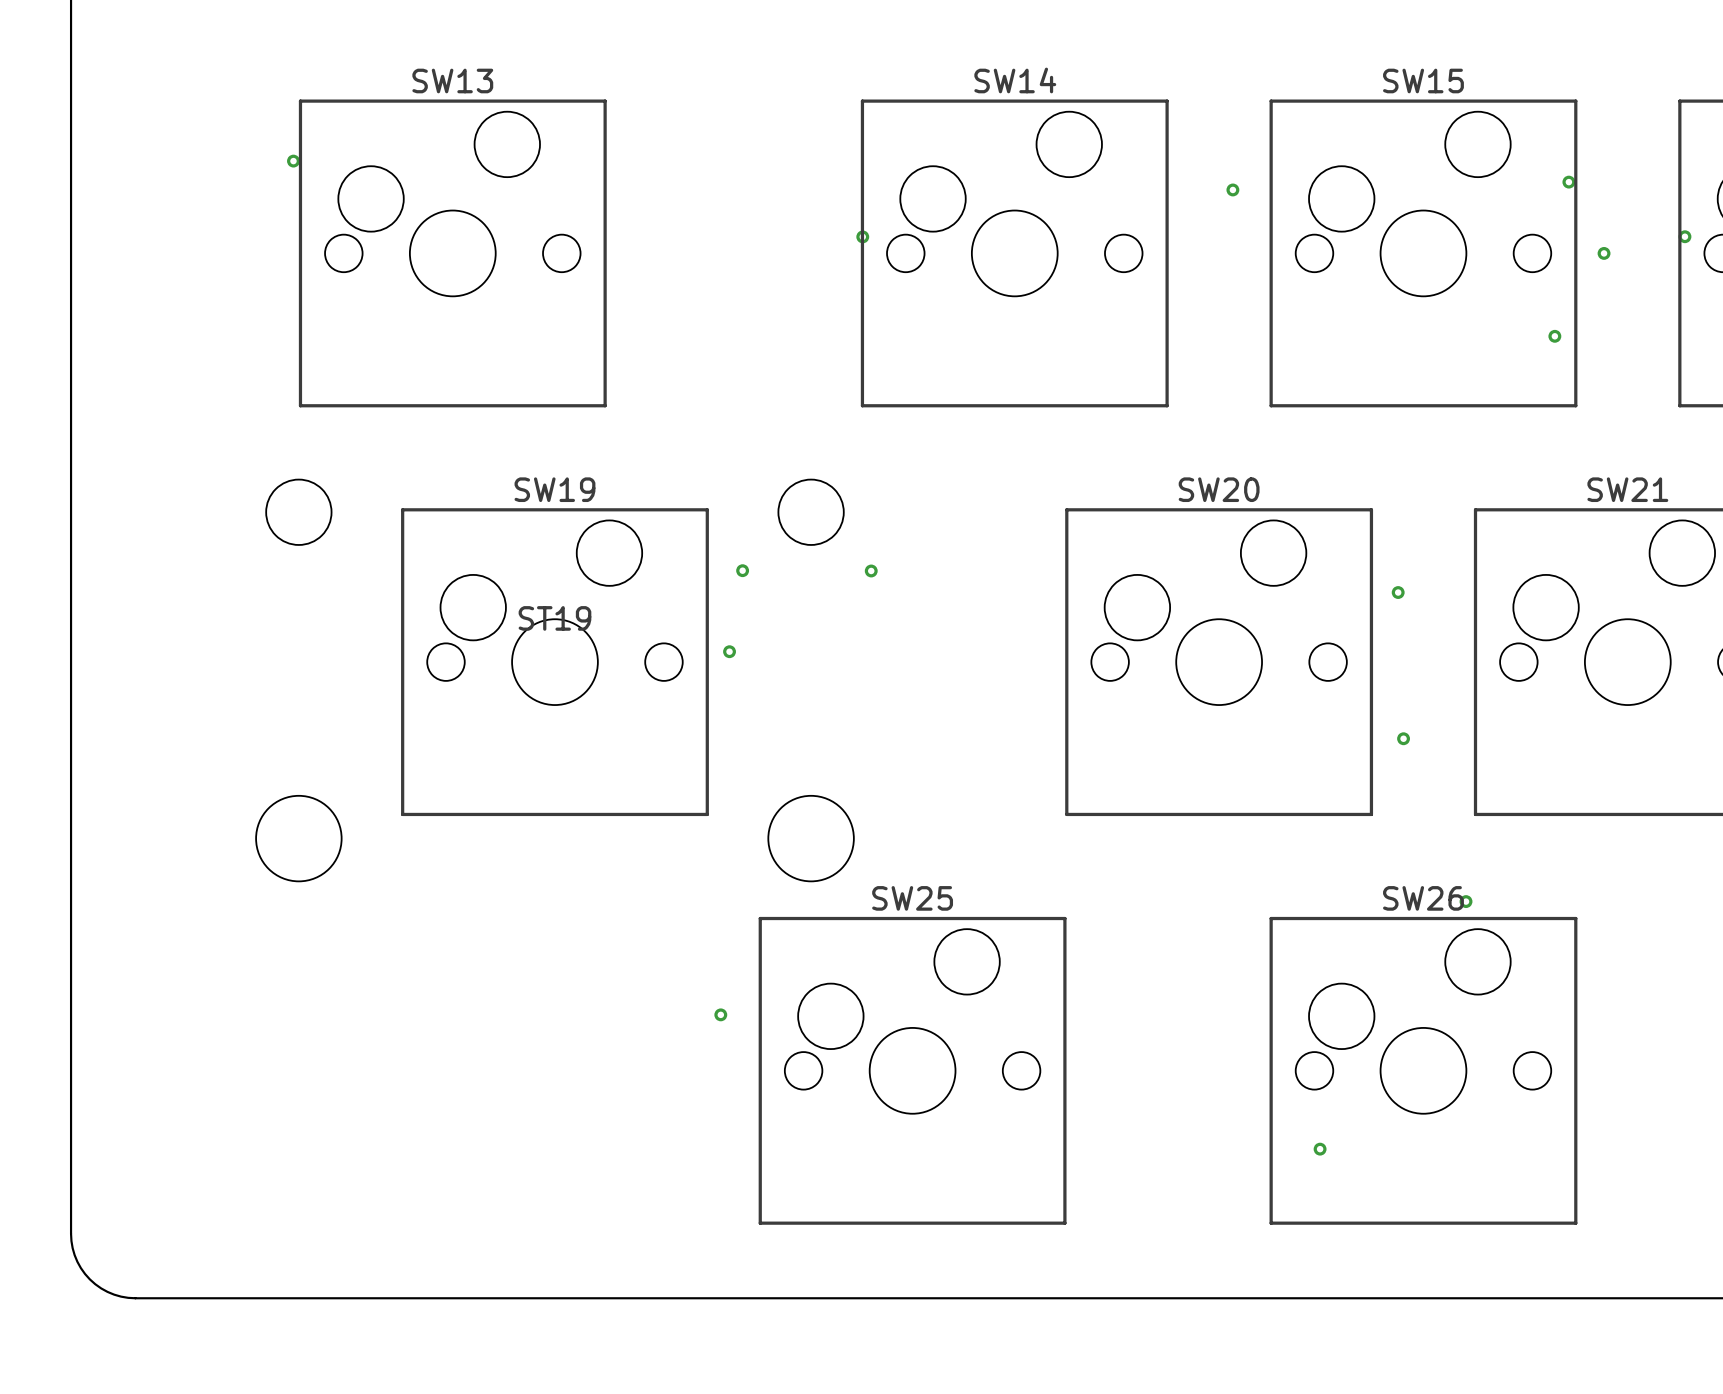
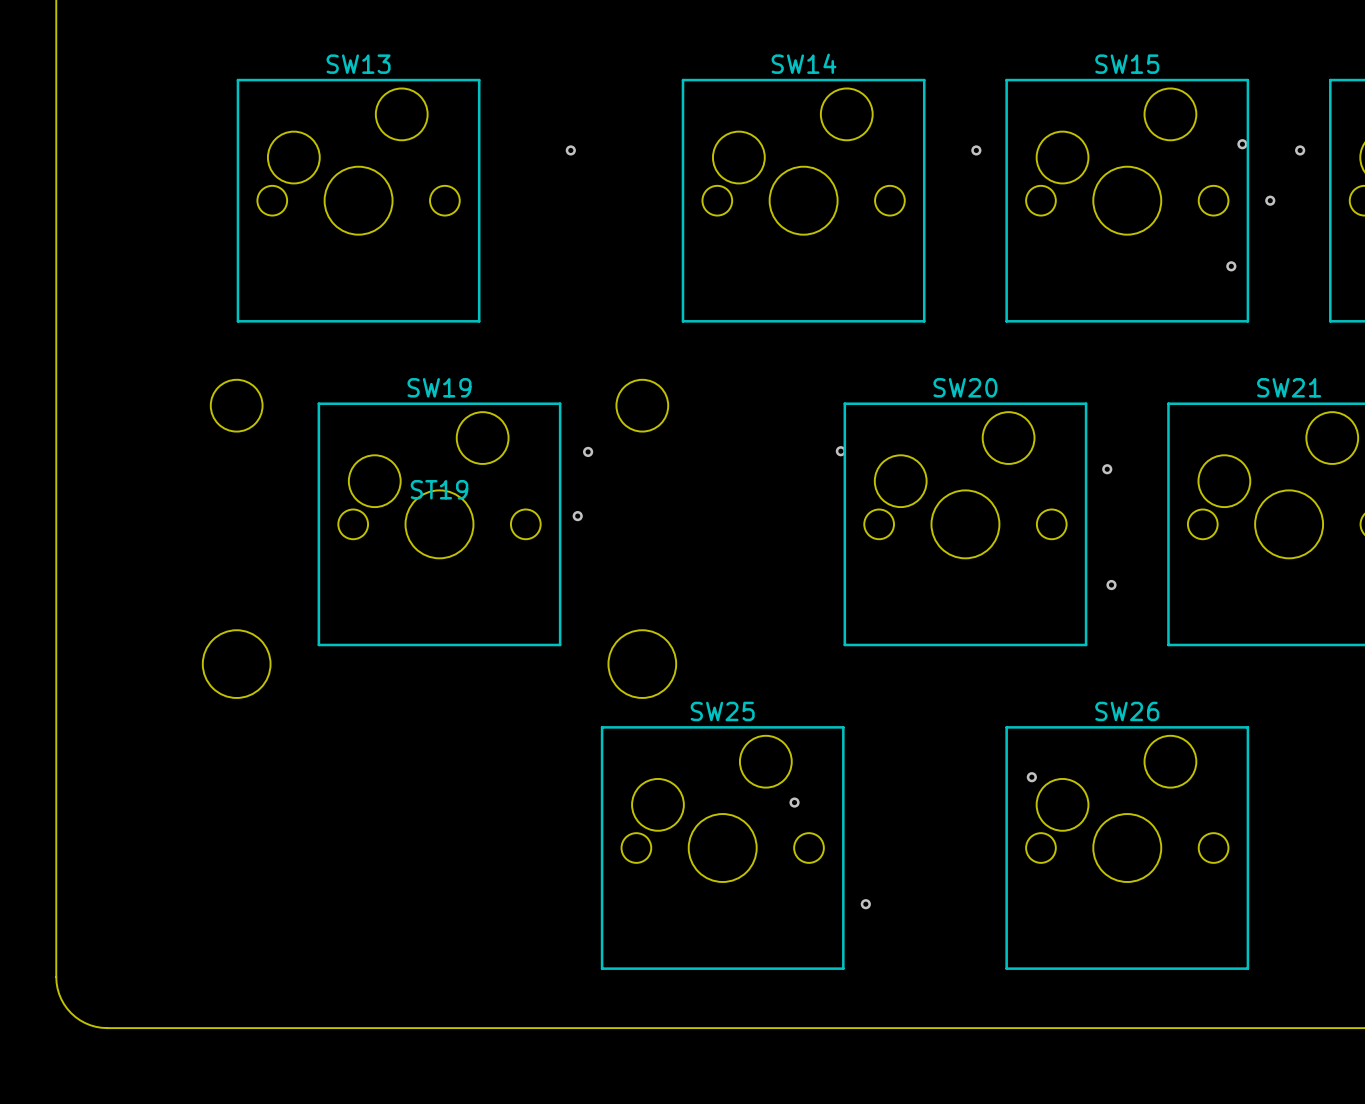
via: (293, 161) -> none
via: none -> (570, 150)
via: (862, 236) -> none
via position: (1684, 236) -> (1300, 150)
via: none -> (840, 451)
via: (871, 570) -> none
via: (1466, 901) -> none
via: none -> (1031, 777)
via: none -> (794, 802)
via: (720, 1014) -> none
via: none -> (865, 904)
via: (1320, 1149) -> none

